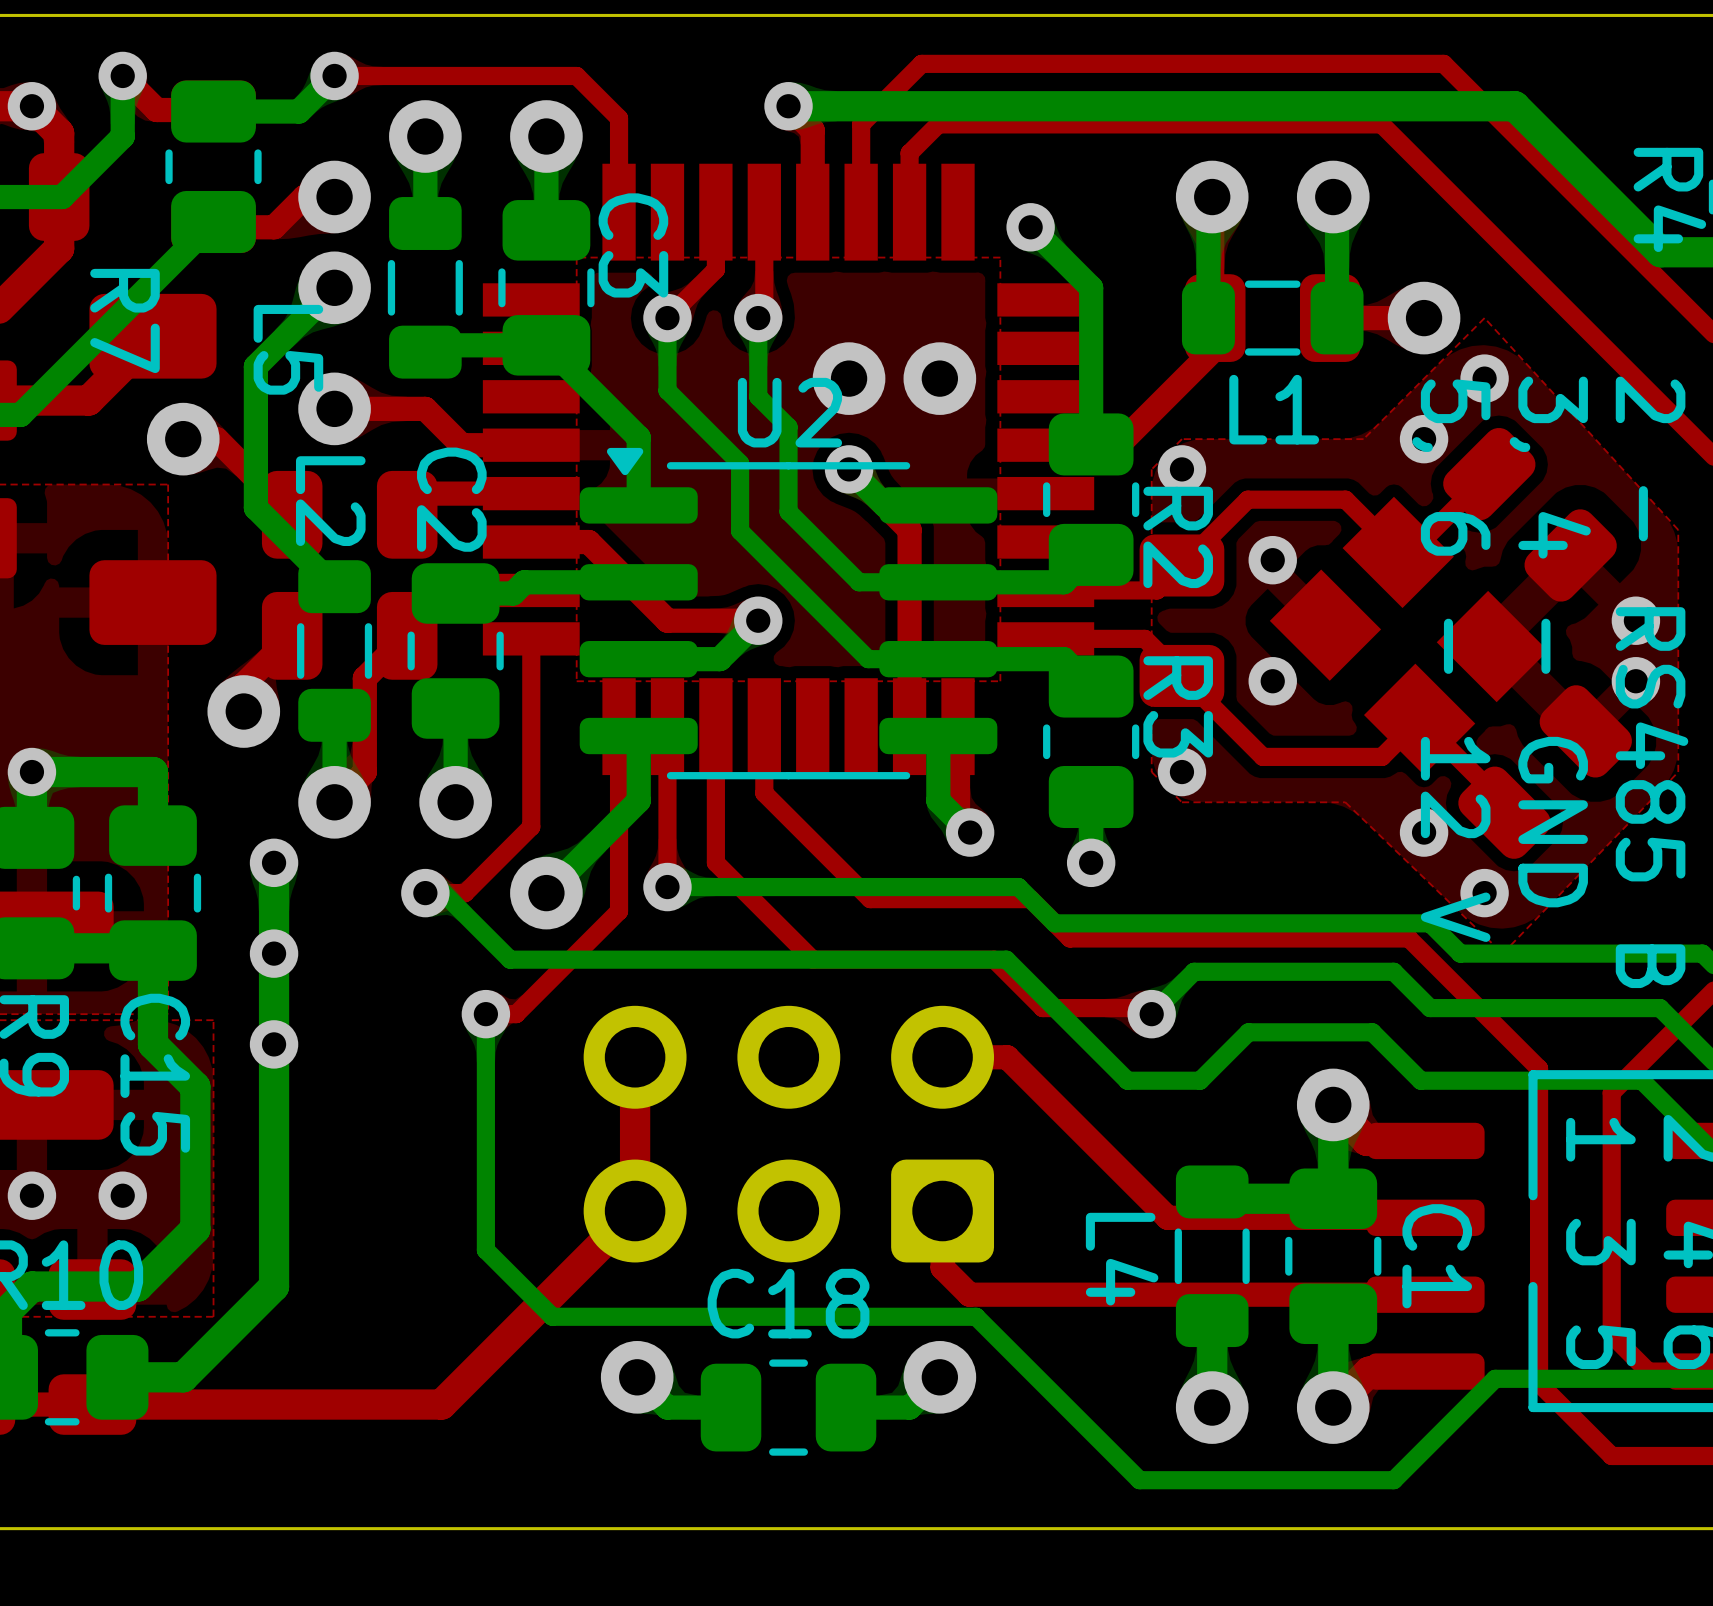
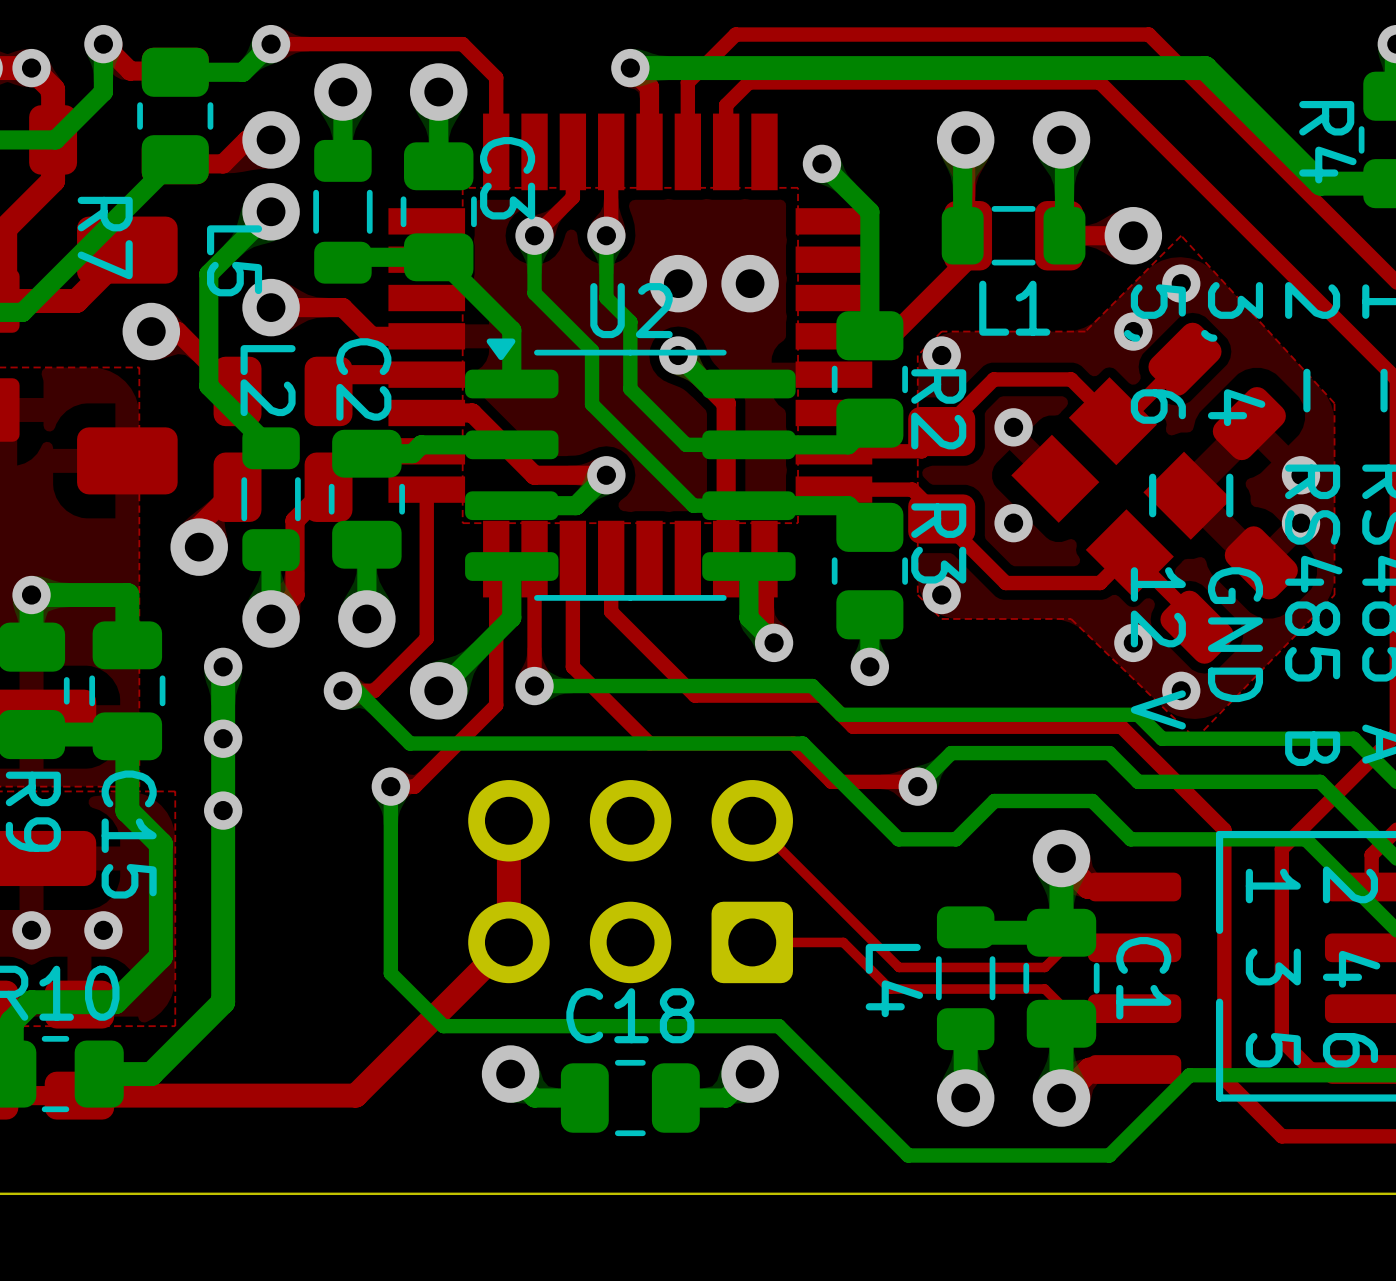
top track: (942, 1057) (1007, 1057) (1167, 1217) (1337, 1217) -> (752, 820) (898, 967) (1044, 967) (1064, 947)
top track: (942, 1211) (942, 1267) (969, 1294) (1337, 1294) -> (752, 942) (843, 942) (890, 989) (1044, 989) (1064, 1008)

